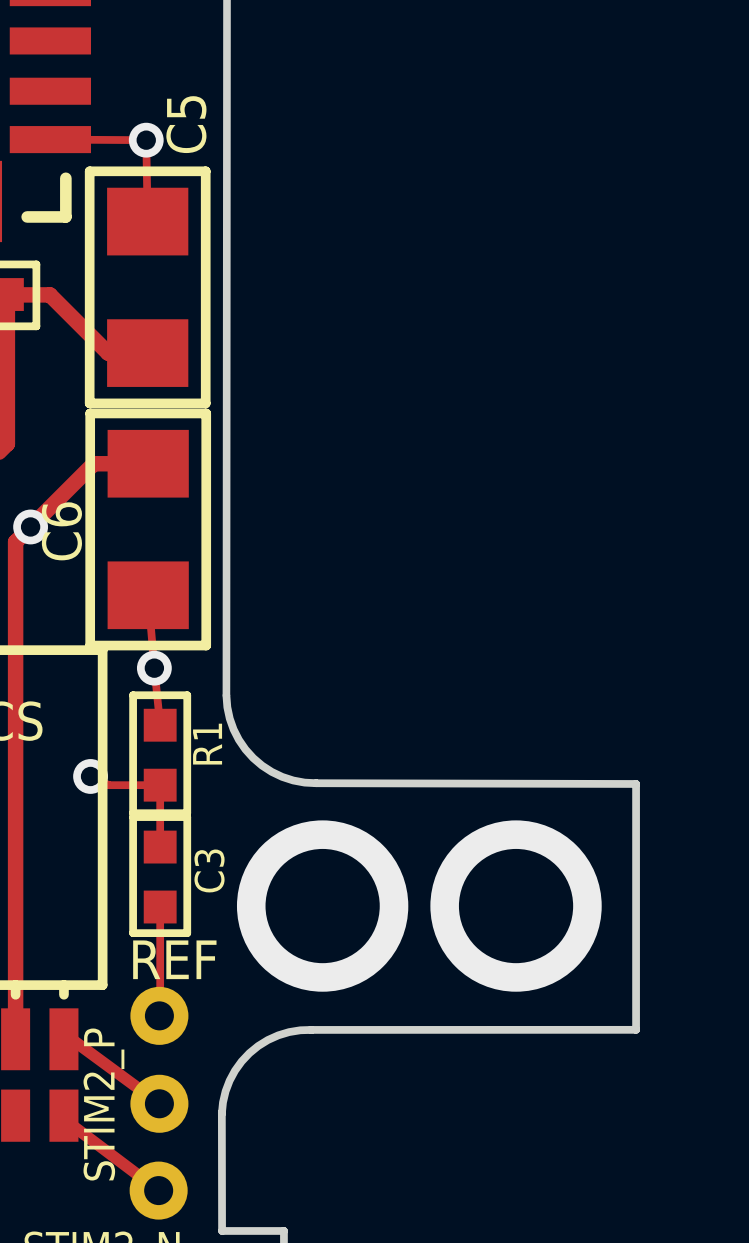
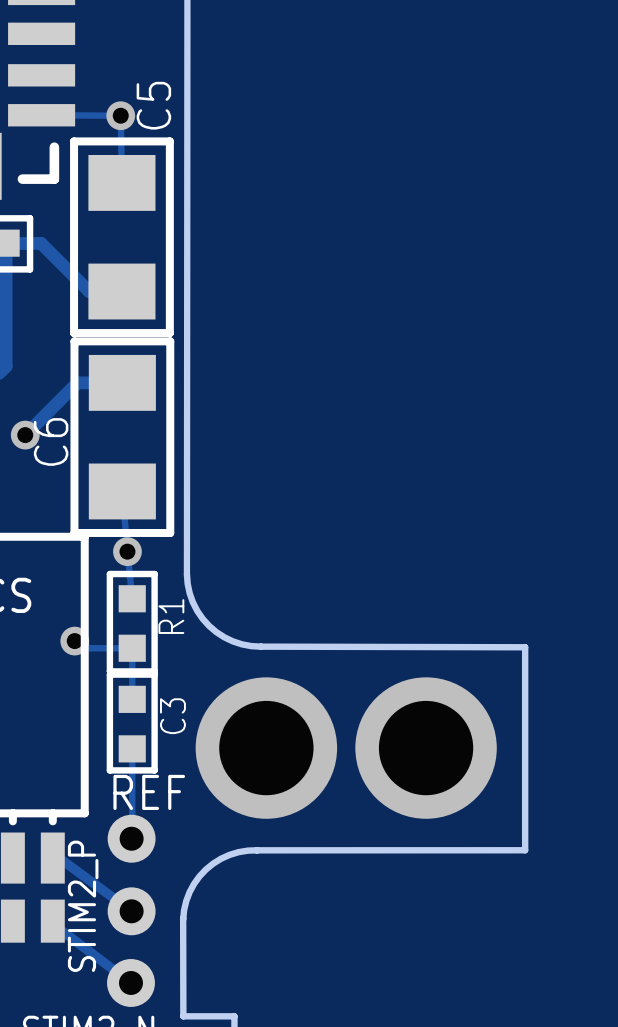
track: (30, 526) (15, 541) (15, 1039) -> none

